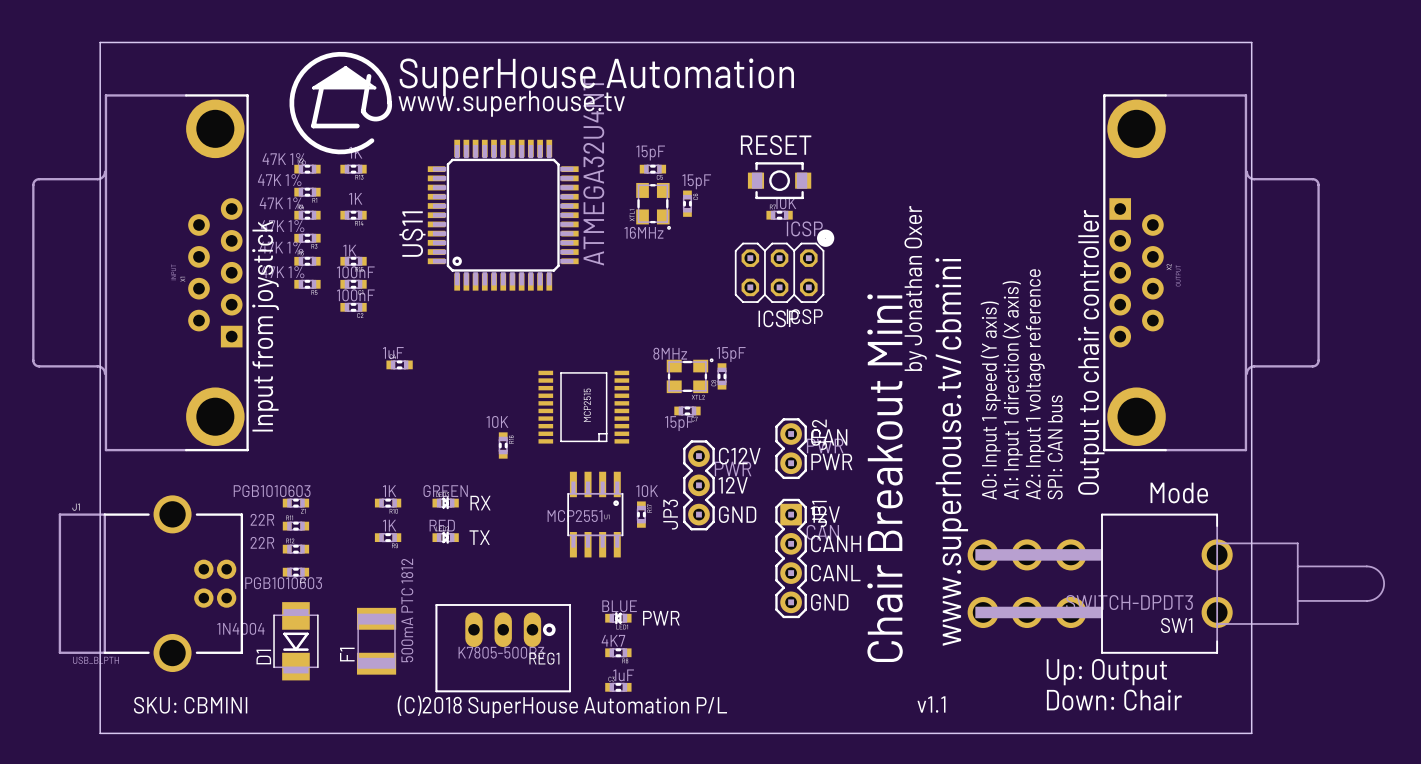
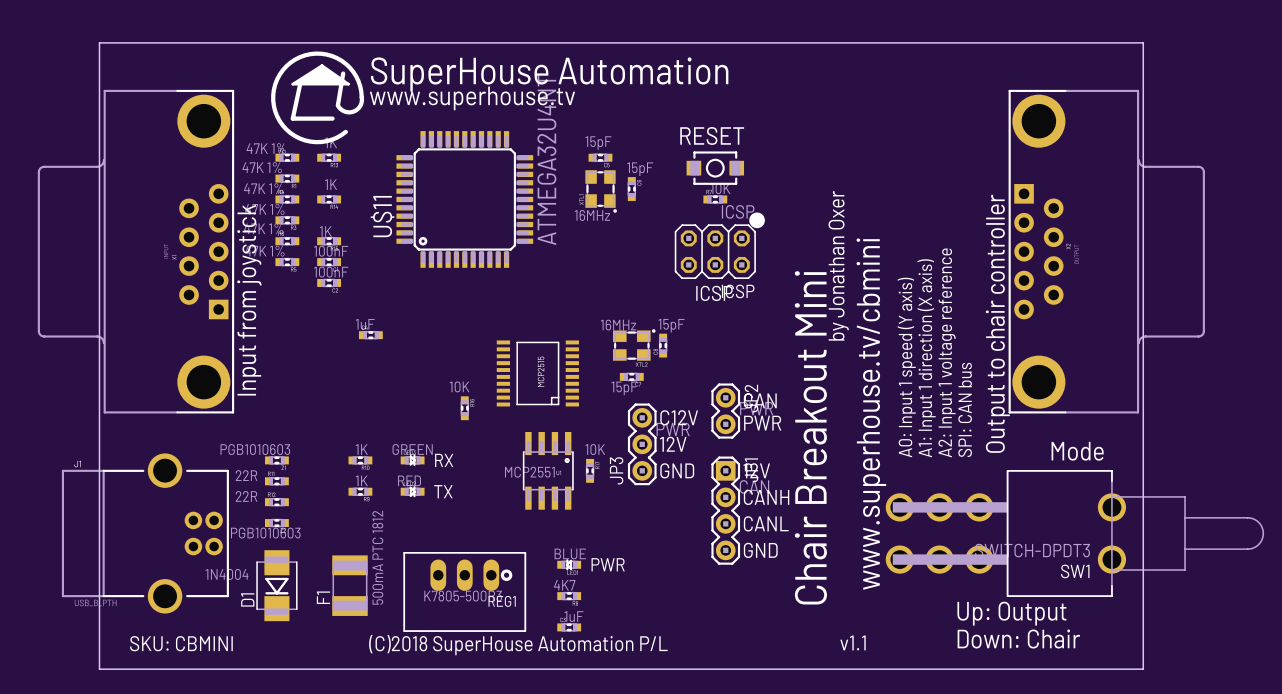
part value: 8MHz (670, 353) -> 16MHz (618, 325)

